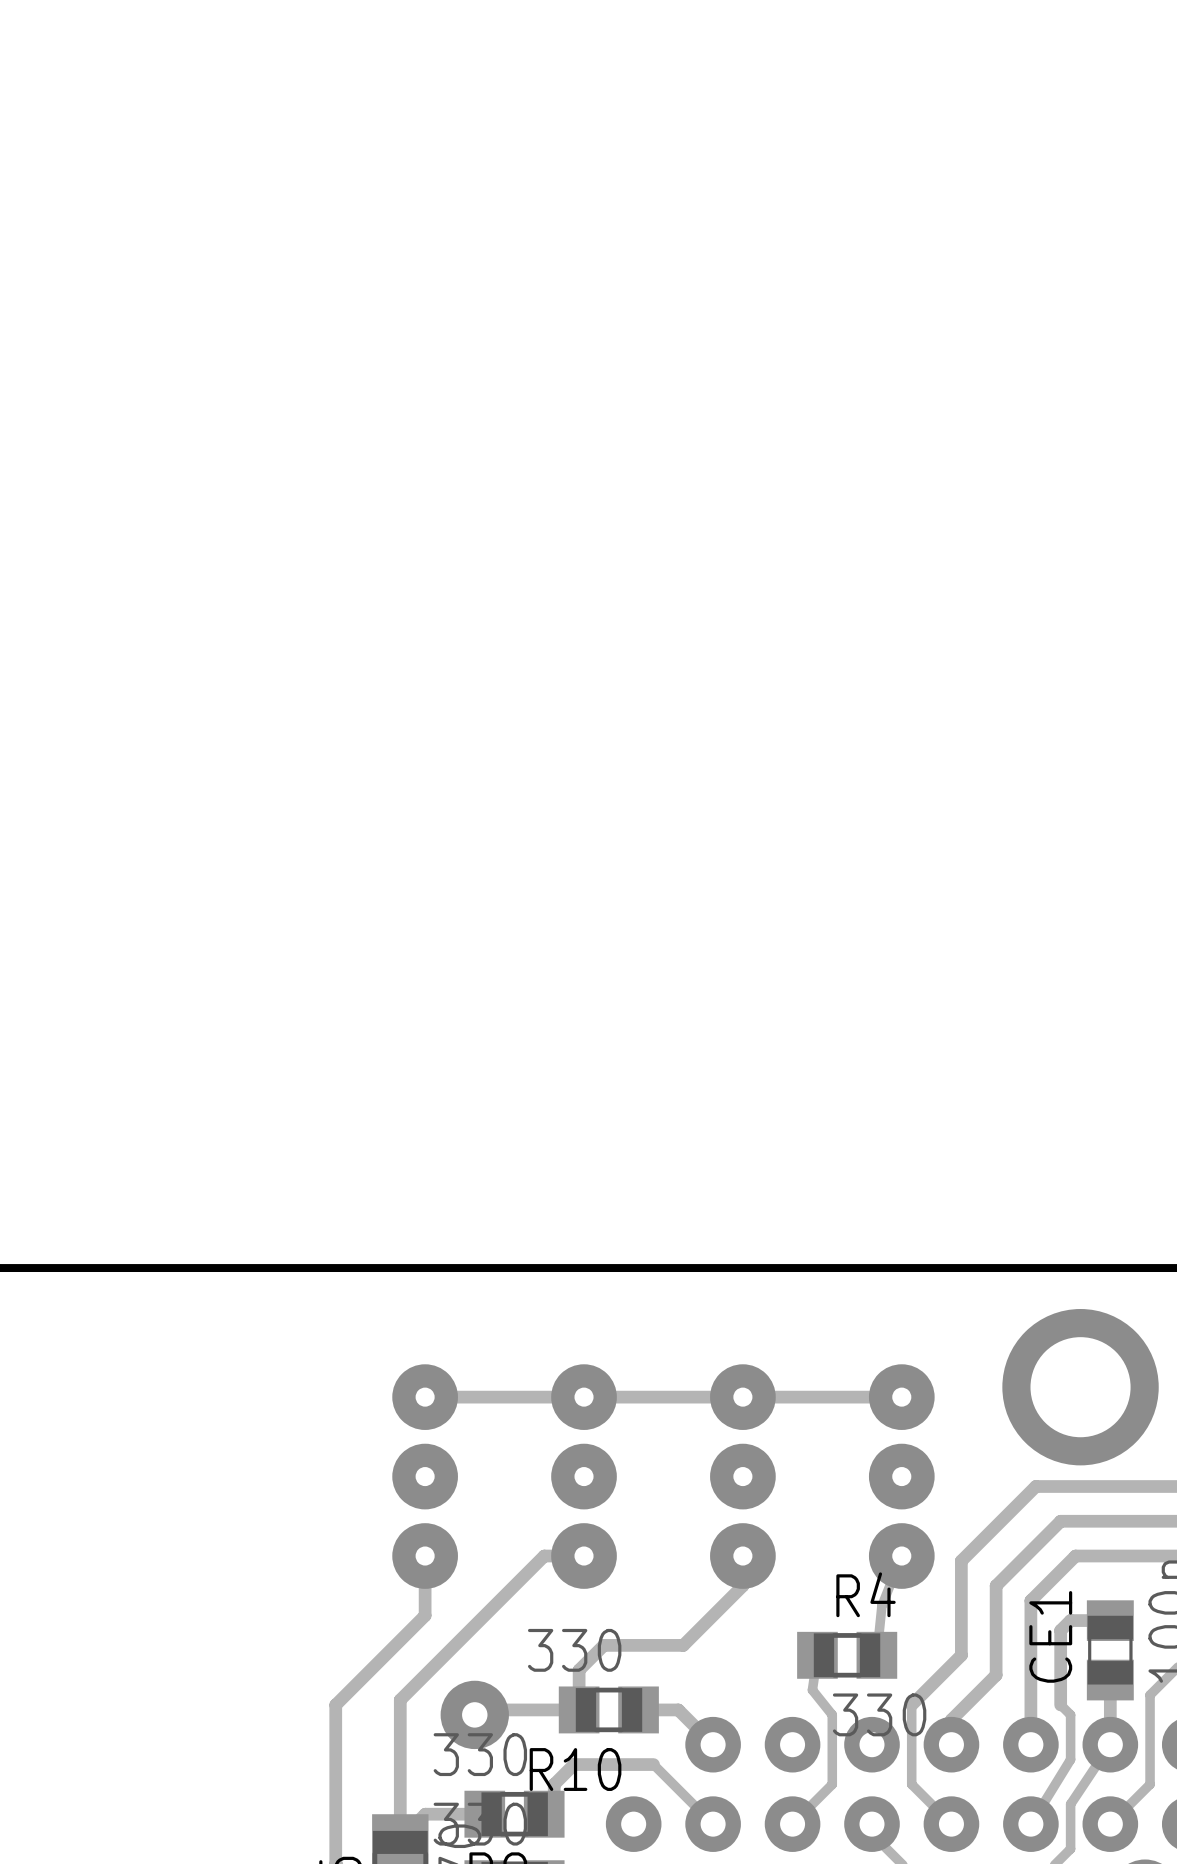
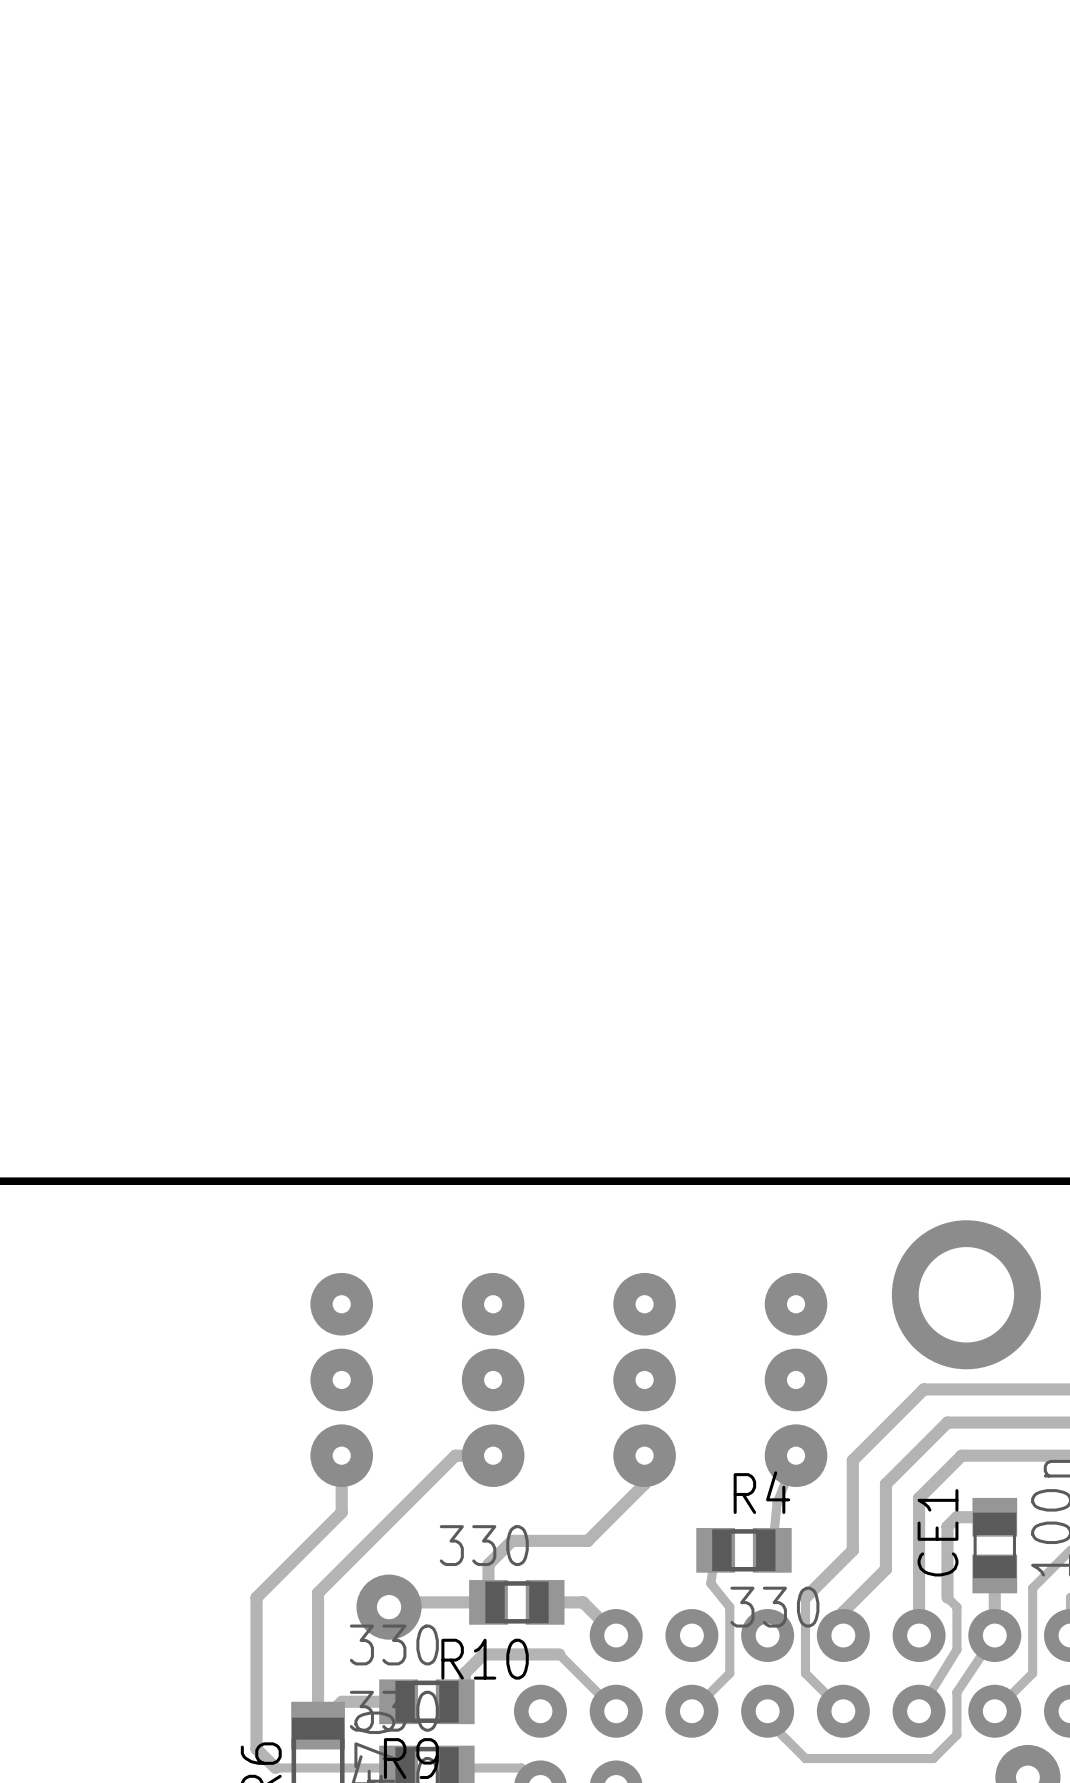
track: (901, 1397) (425, 1397) -> none

